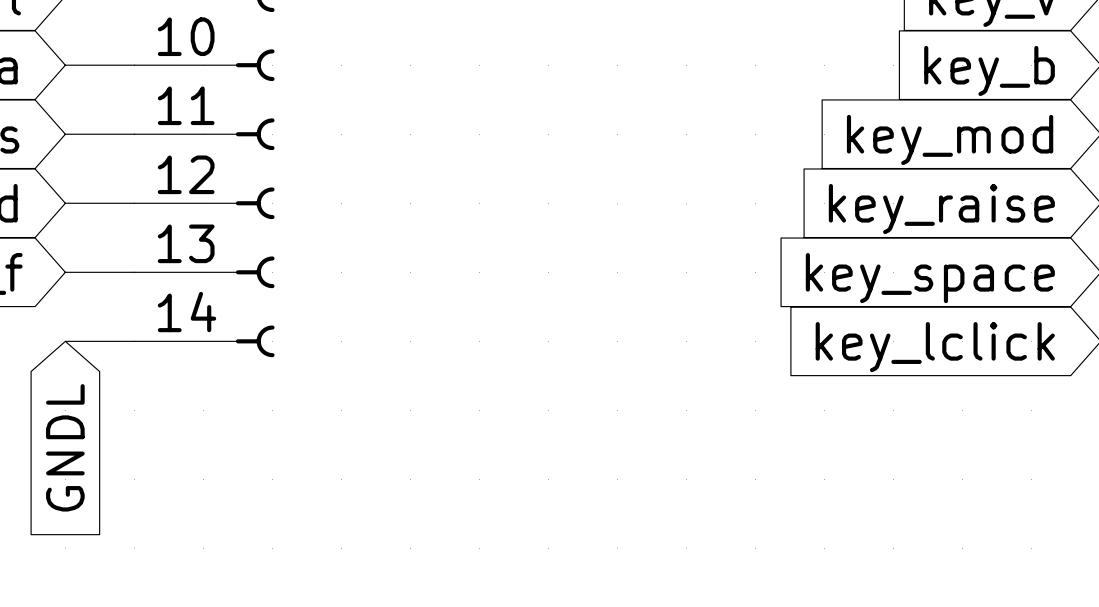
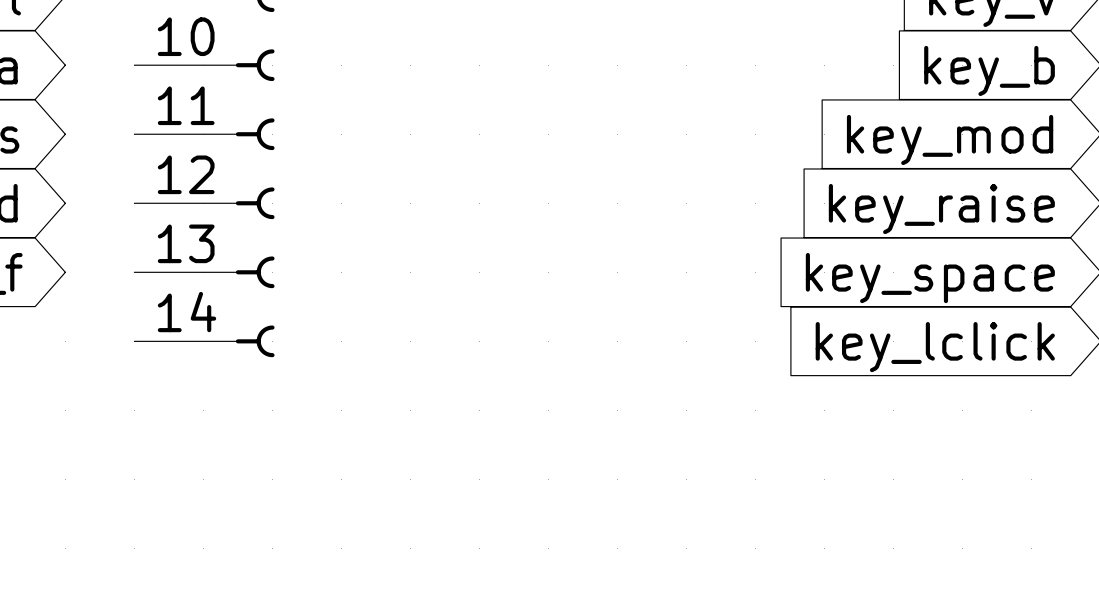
wire: (65, 65) (134, 65) -> none
wire: (65, 134) (134, 134) -> none
wire: (65, 203) (134, 203) -> none
wire: (65, 272) (134, 272) -> none
wire: (65, 341) (134, 341) -> none
global label: GNDL (65, 447) -> none

